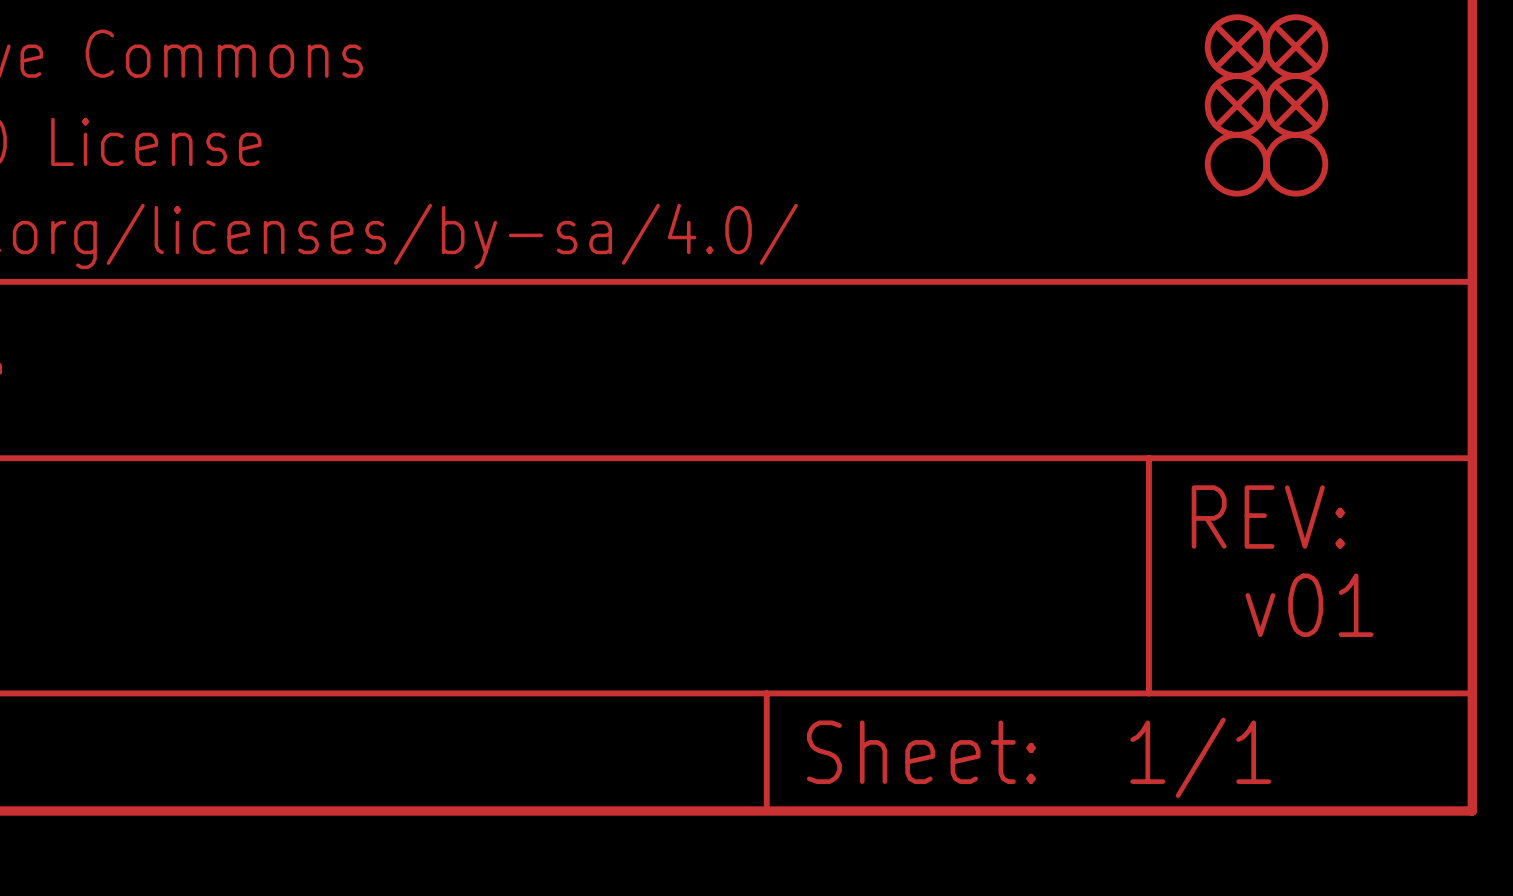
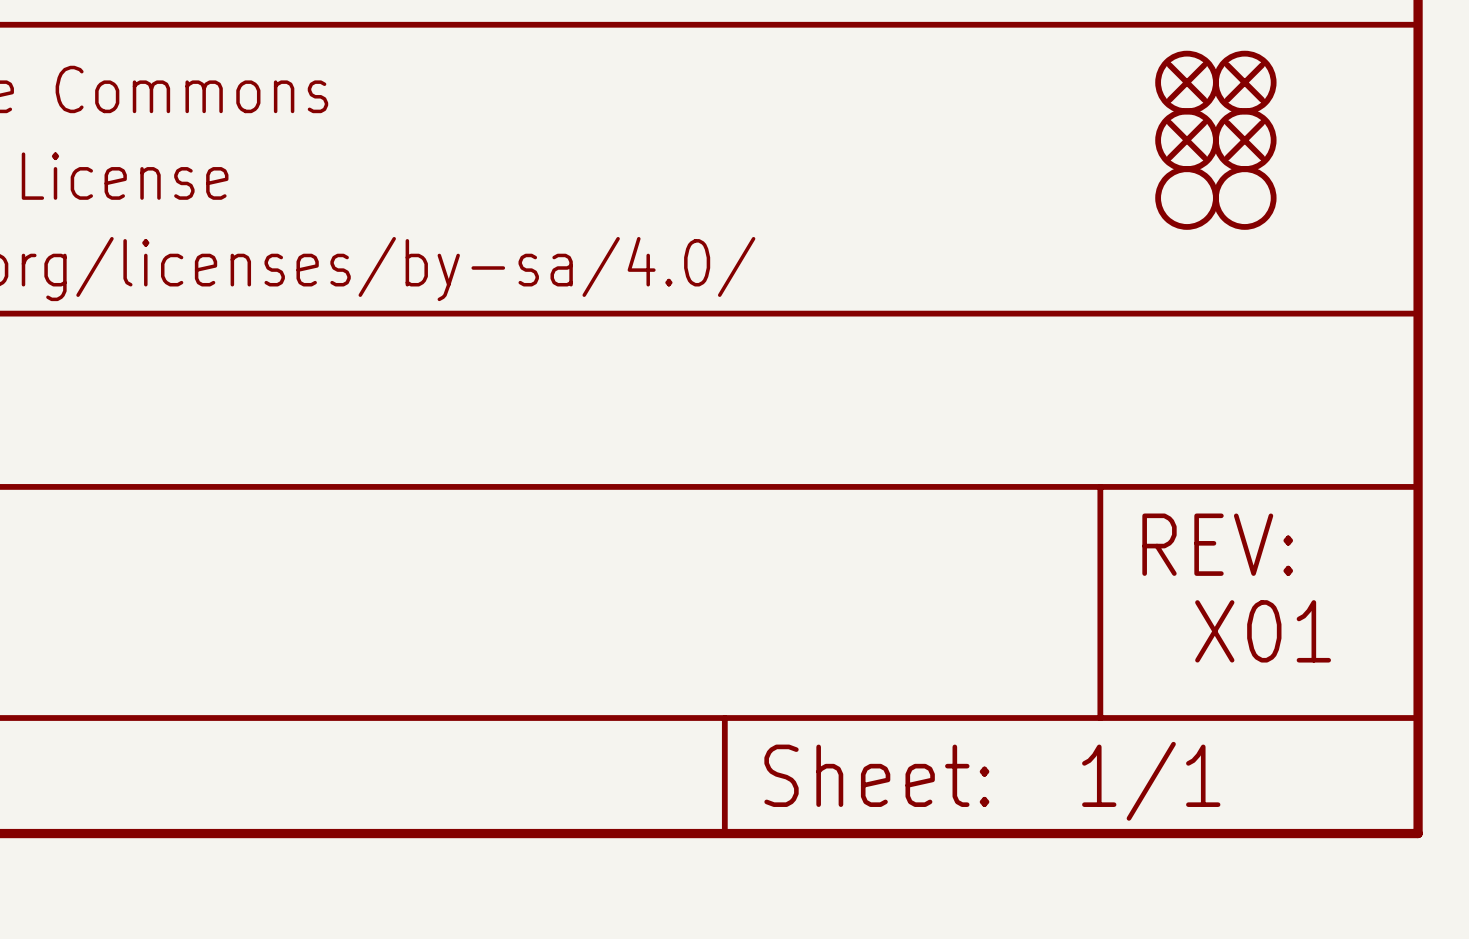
text: v01 (1309, 605) -> X01 (1263, 631)

